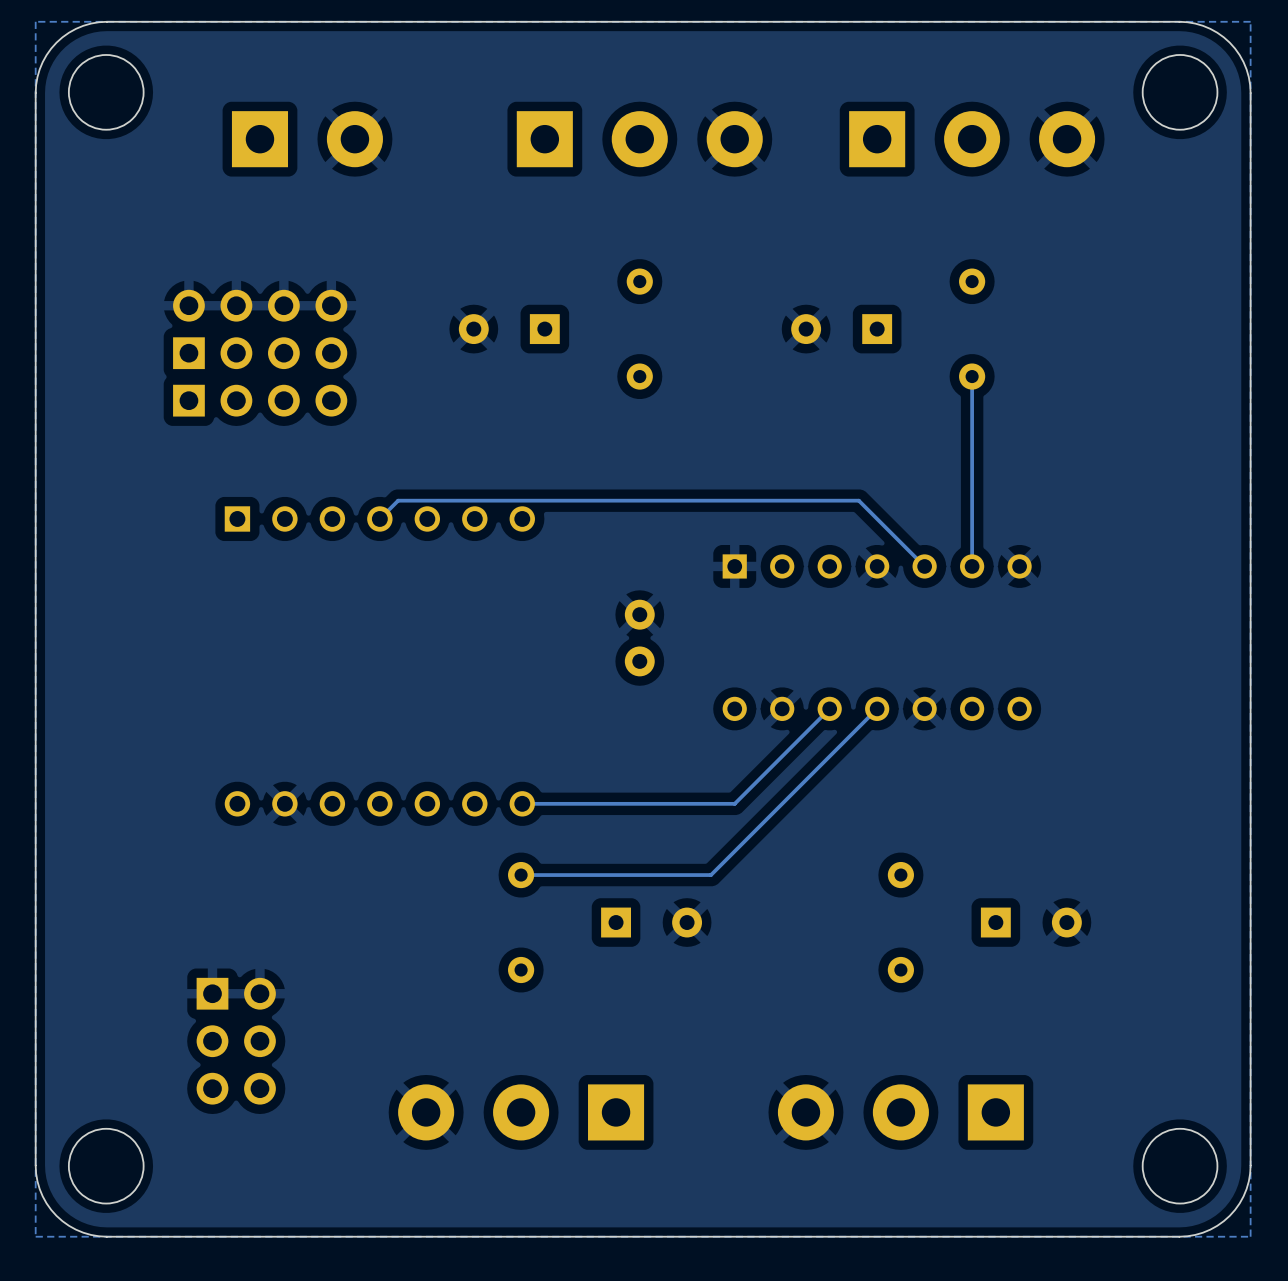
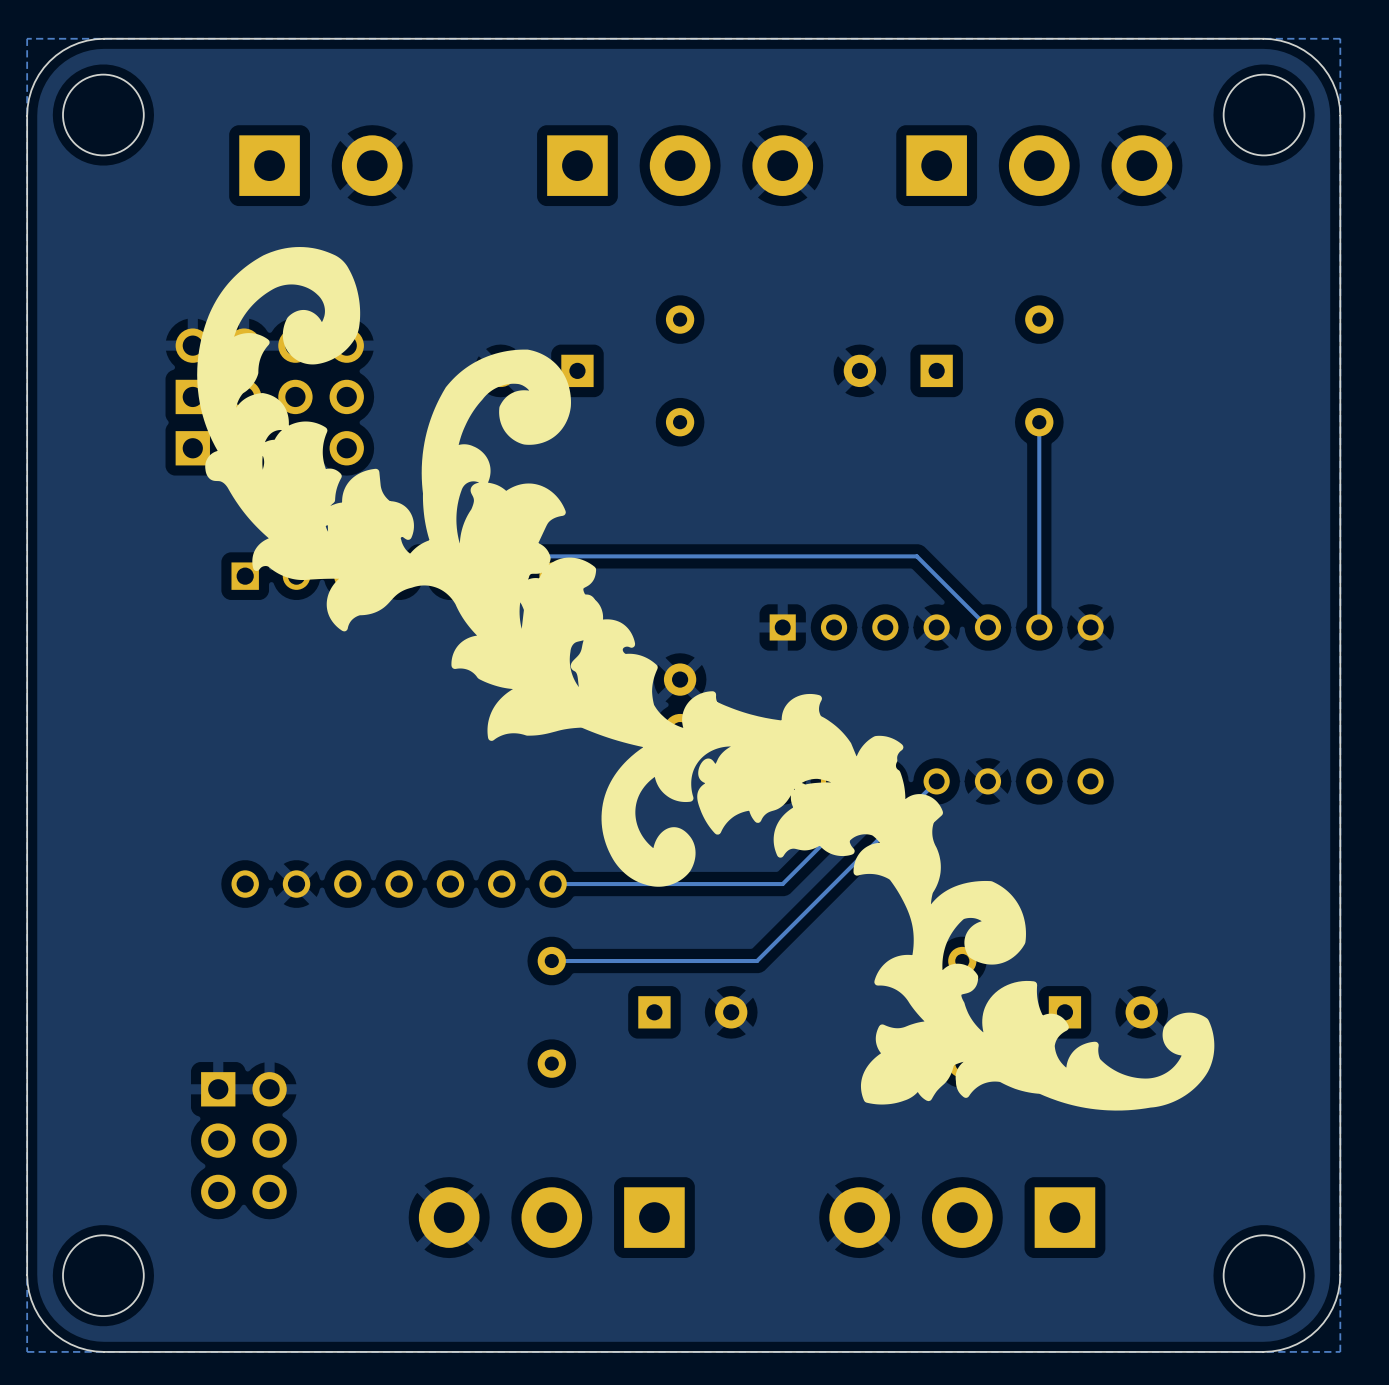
drawing: none -> [197, 247, 1215, 1111]

